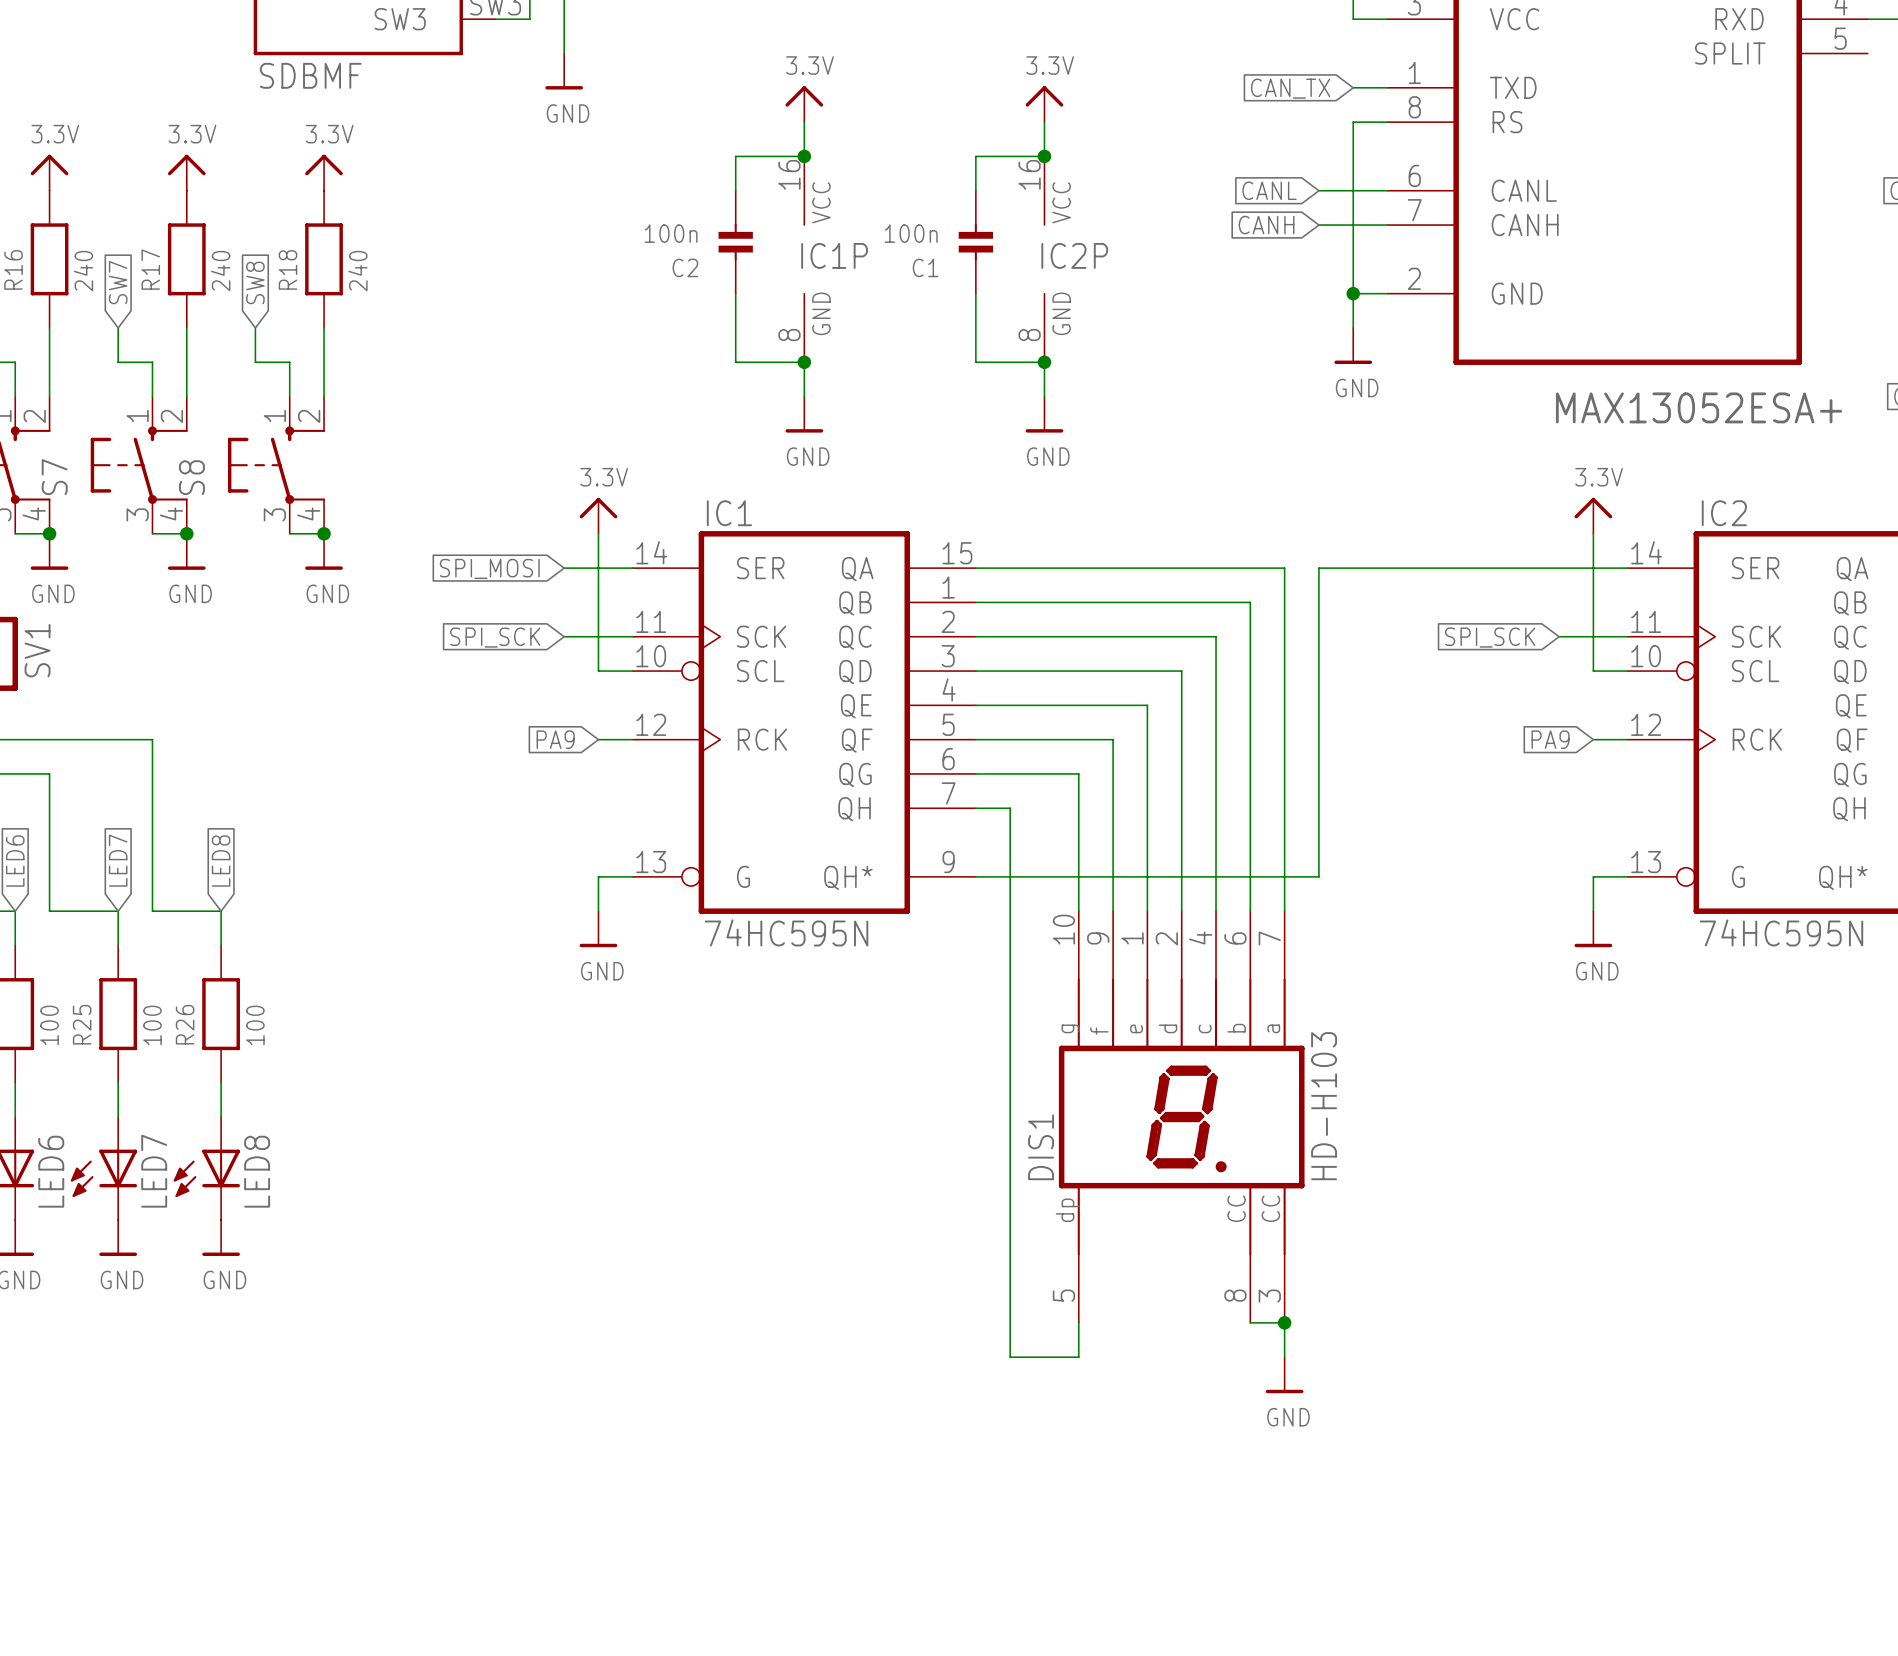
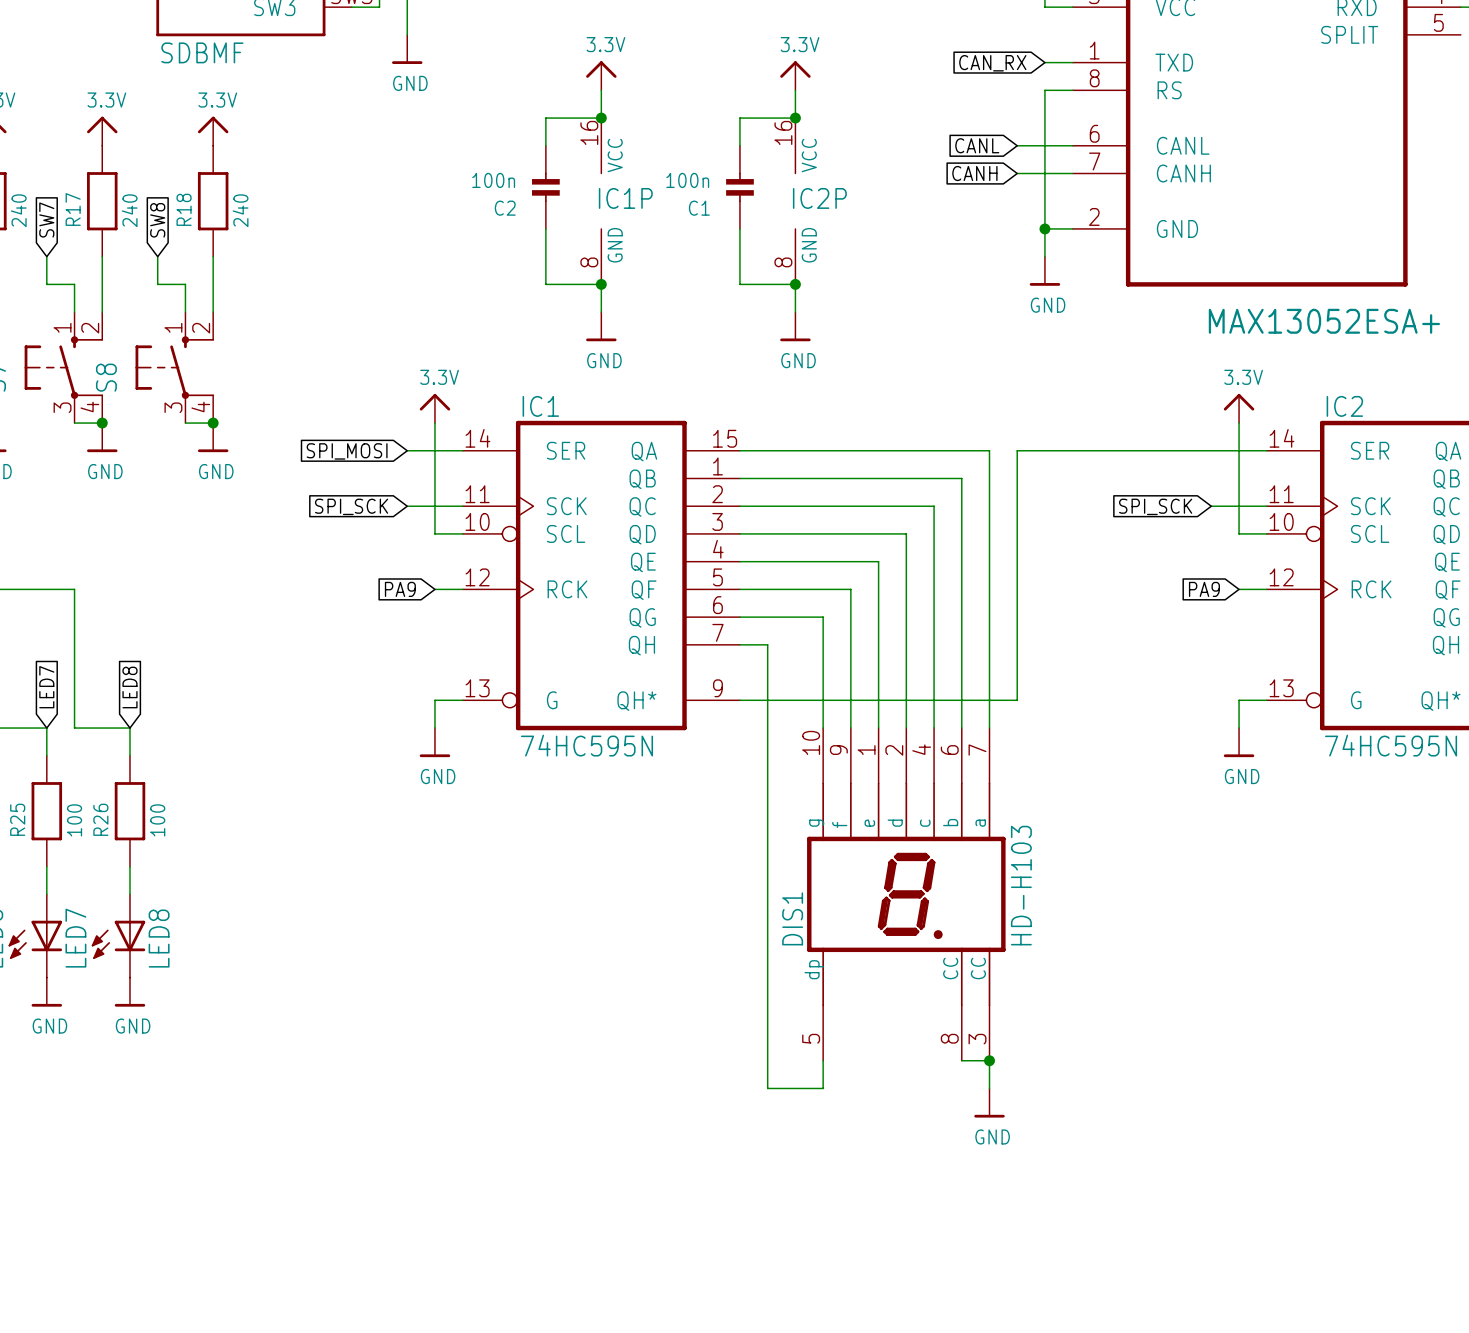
global label: CAN_TX (1290, 88) -> CAN_RX (992, 63)

